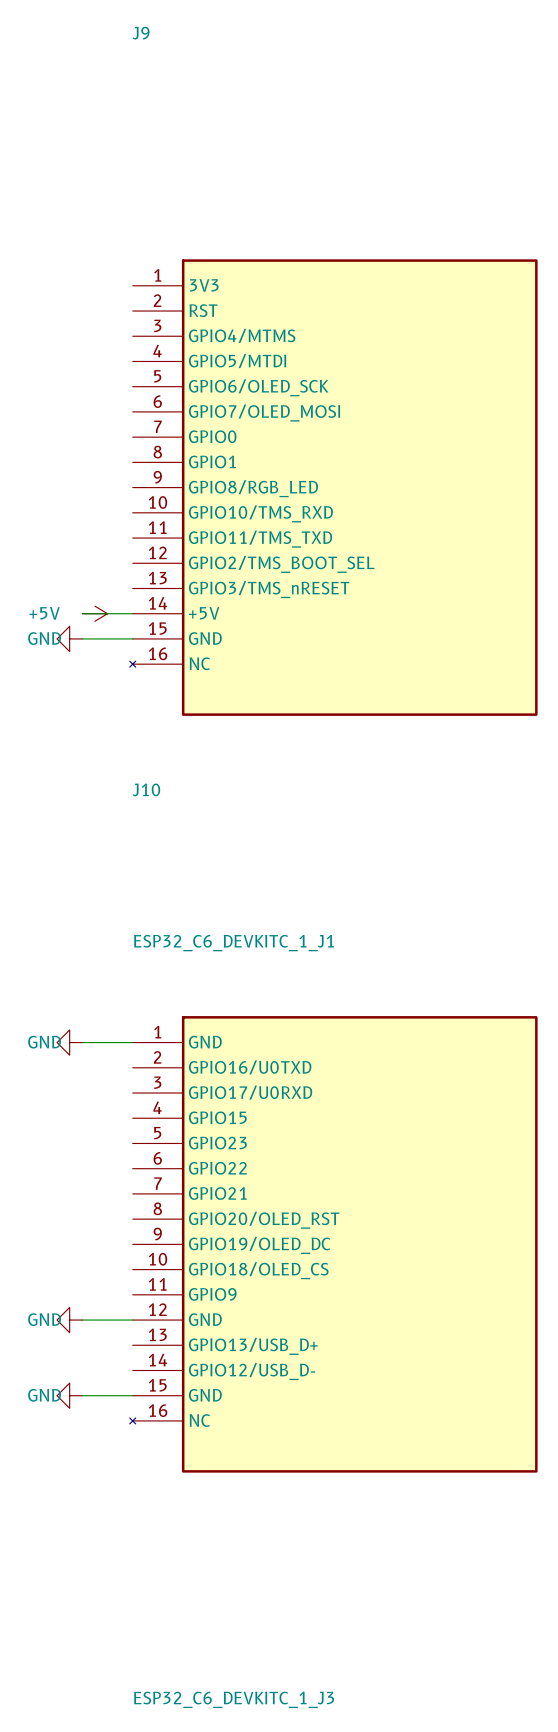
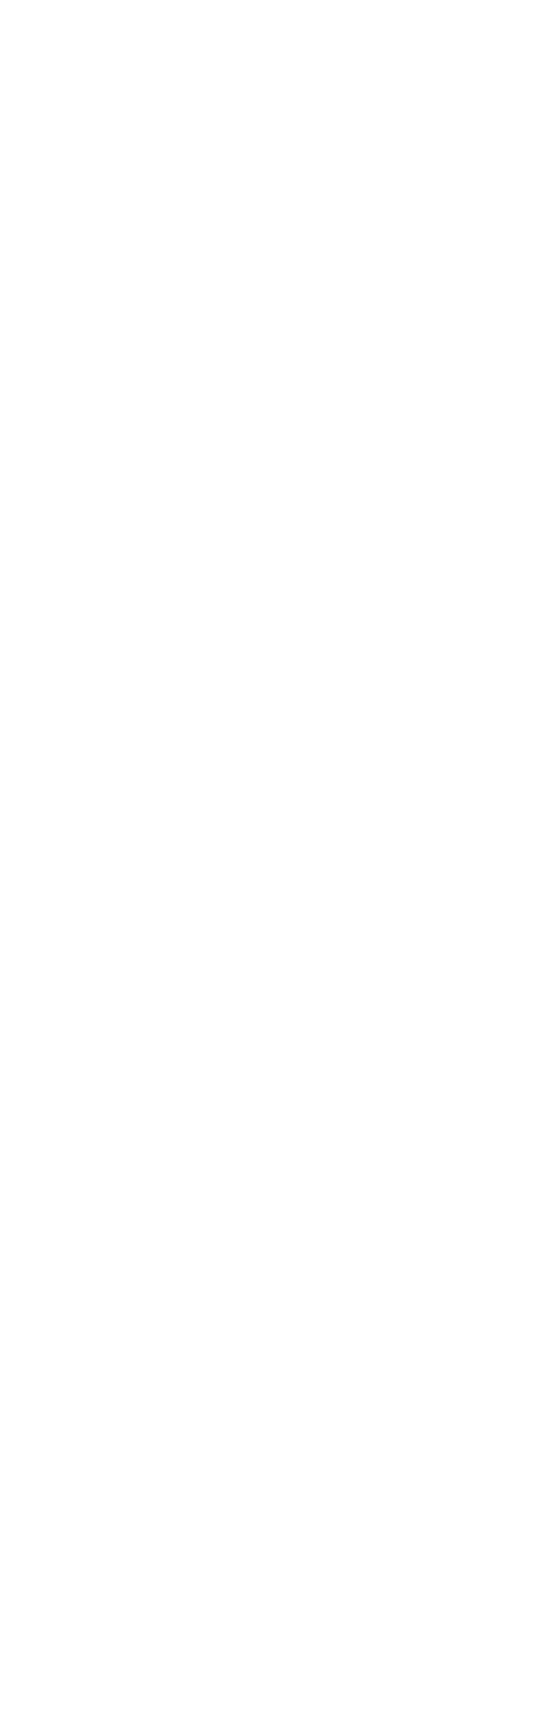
J9: ESP32_C6_DEVKITC_1_J1 (333, 487) -> none
wire: (82, 613) (132, 613) -> none
power symbol: +5V (94, 613) -> none
power symbol: GND (69, 638) -> none
wire: (82, 638) (132, 638) -> none
power symbol: GND (69, 1042) -> none
wire: (82, 1042) (132, 1042) -> none
J10: ESP32_C6_DEVKITC_1_J3 (333, 1244) -> none
power symbol: GND (69, 1320) -> none
wire: (82, 1320) (132, 1320) -> none
power symbol: GND (69, 1395) -> none
wire: (82, 1395) (132, 1395) -> none

